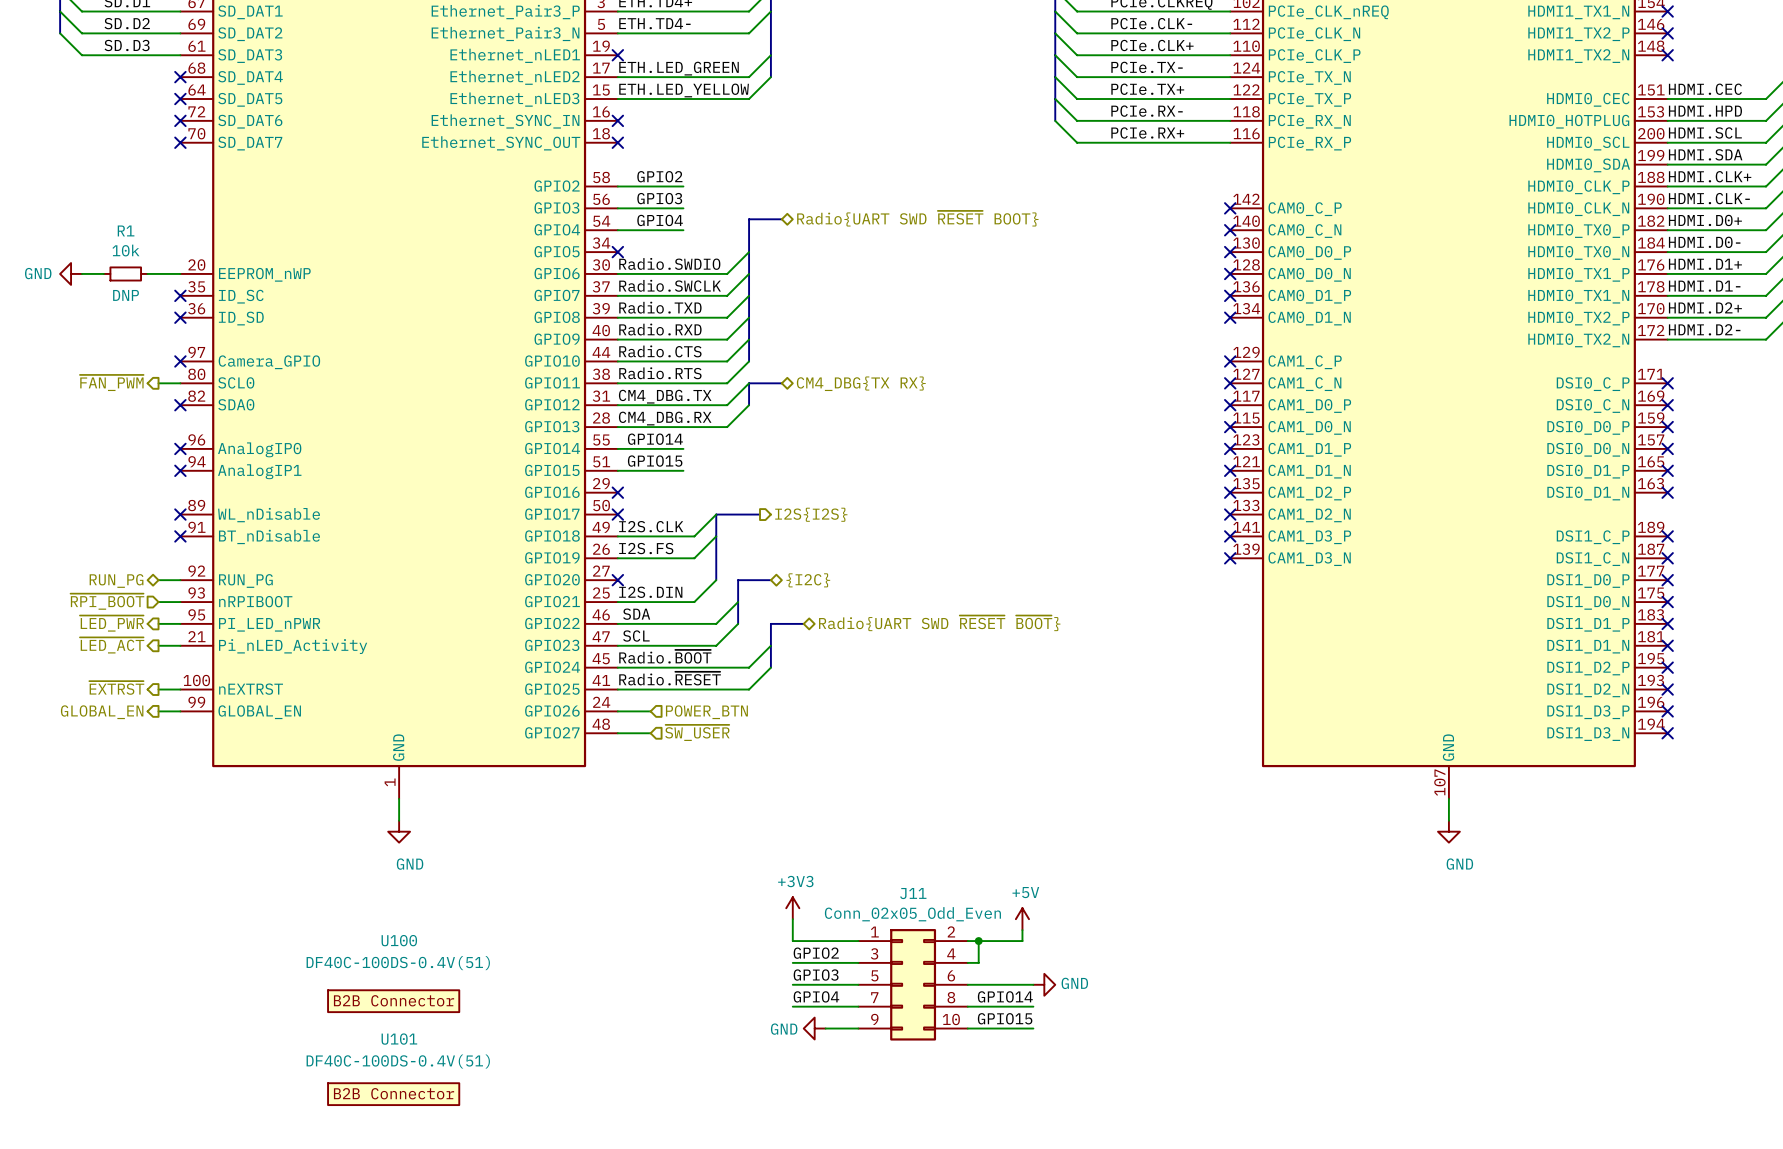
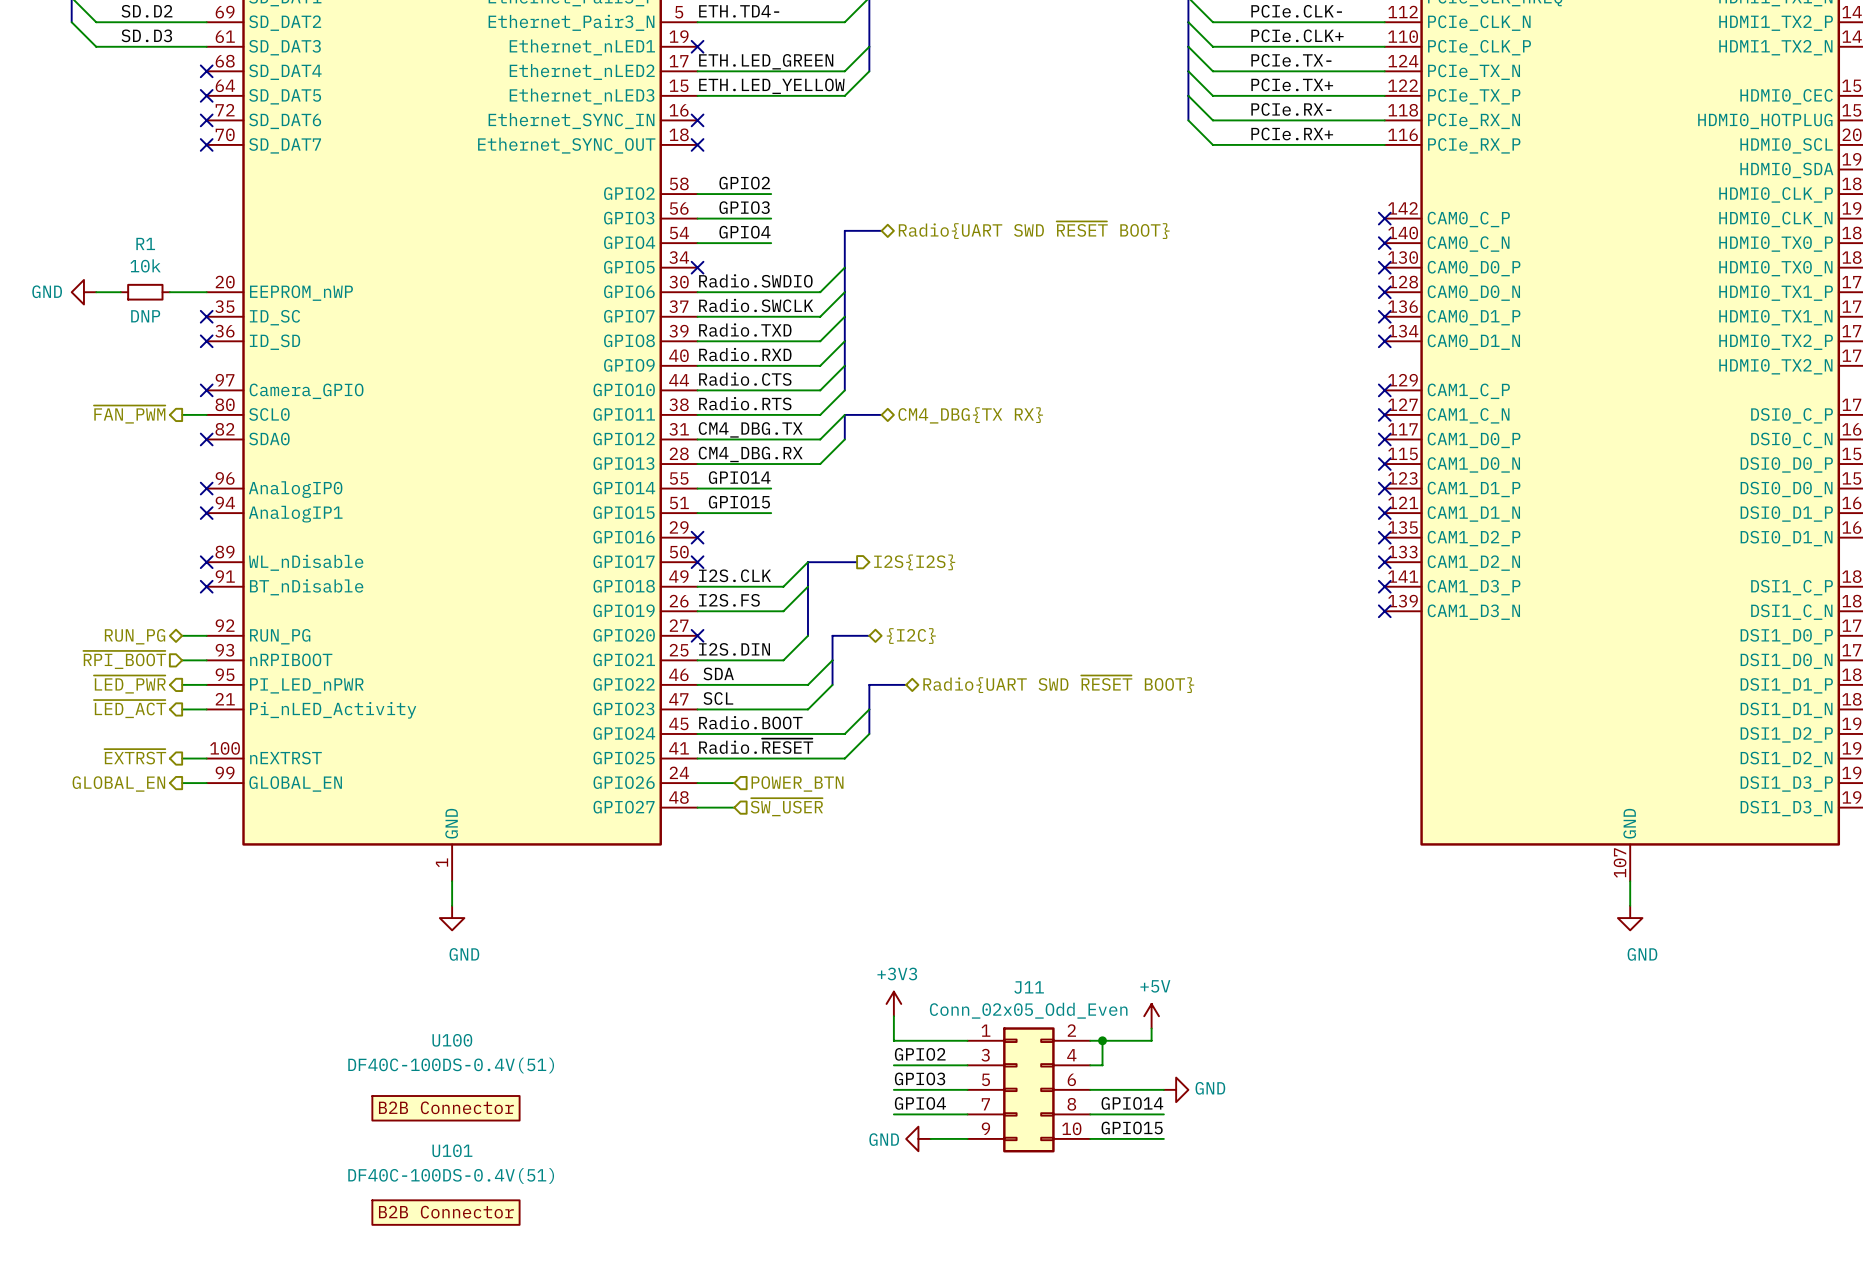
hierarchical label: Radio{UART SWD ~{RESET} ~{BOOT}} (939, 623) -> Radio{UART SWD ~{RESET} BOOT} (1058, 684)
label: Radio.~{BOOT} (665, 656) -> Radio.BOOT (750, 722)

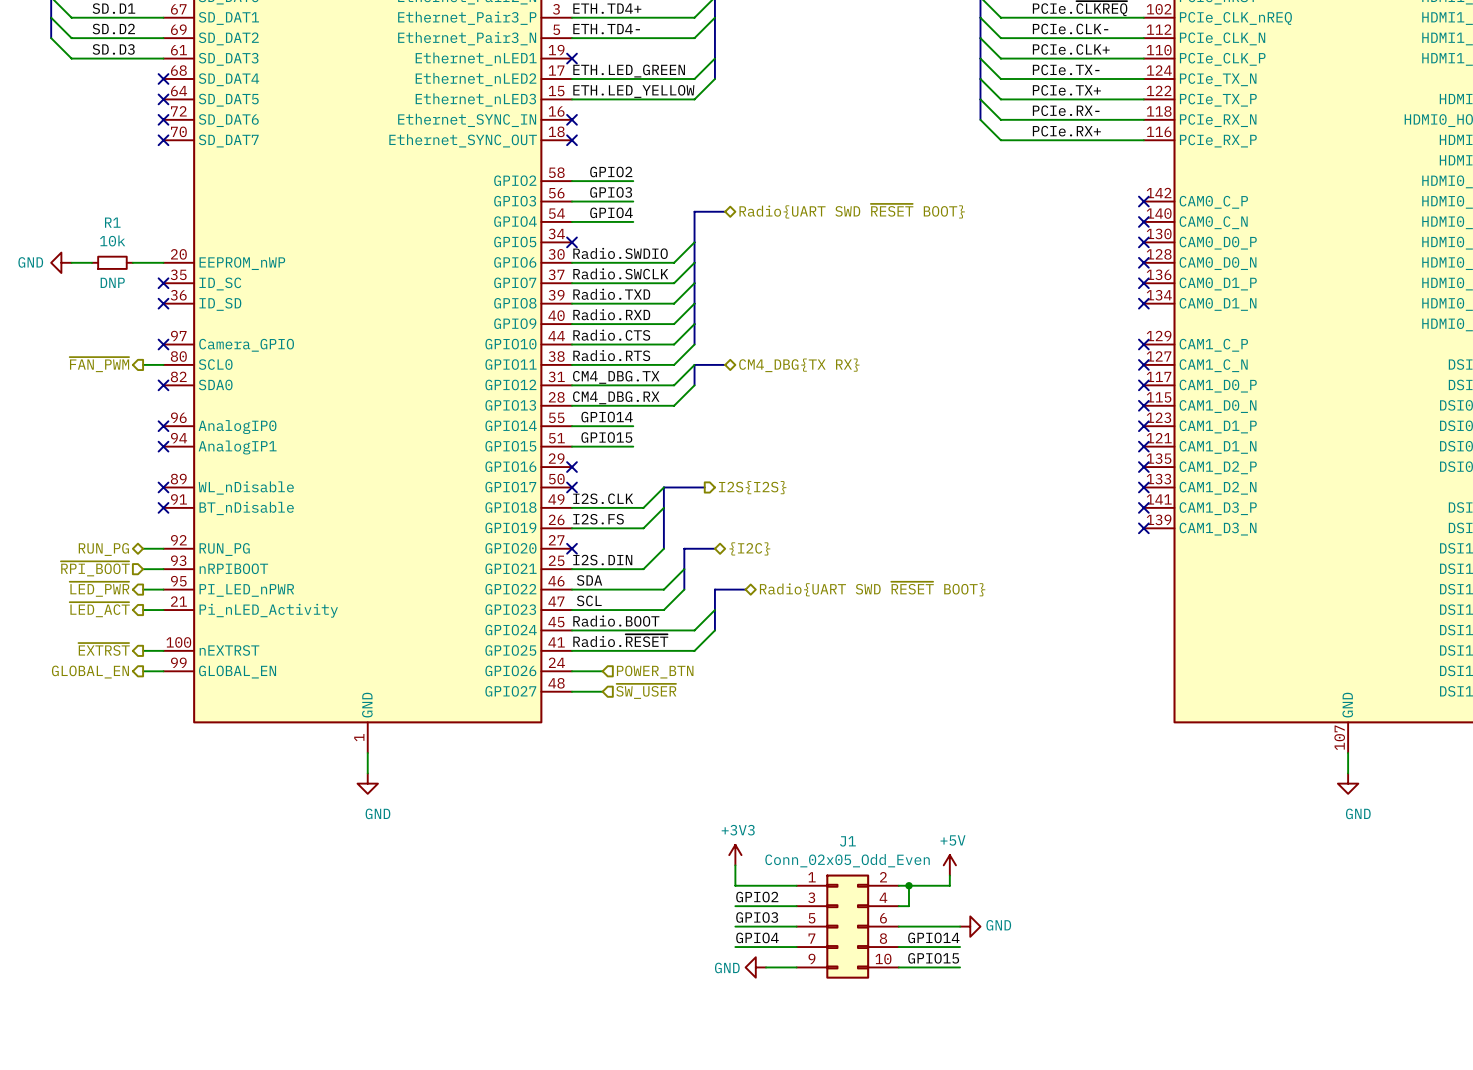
J11 name: J11 (1029, 987) -> J1 (847, 841)
U100: DF40C-100DS-0.4V(51) (445, 1108) -> none
U101: DF40C-100DS-0.4V(51) (445, 1212) -> none

